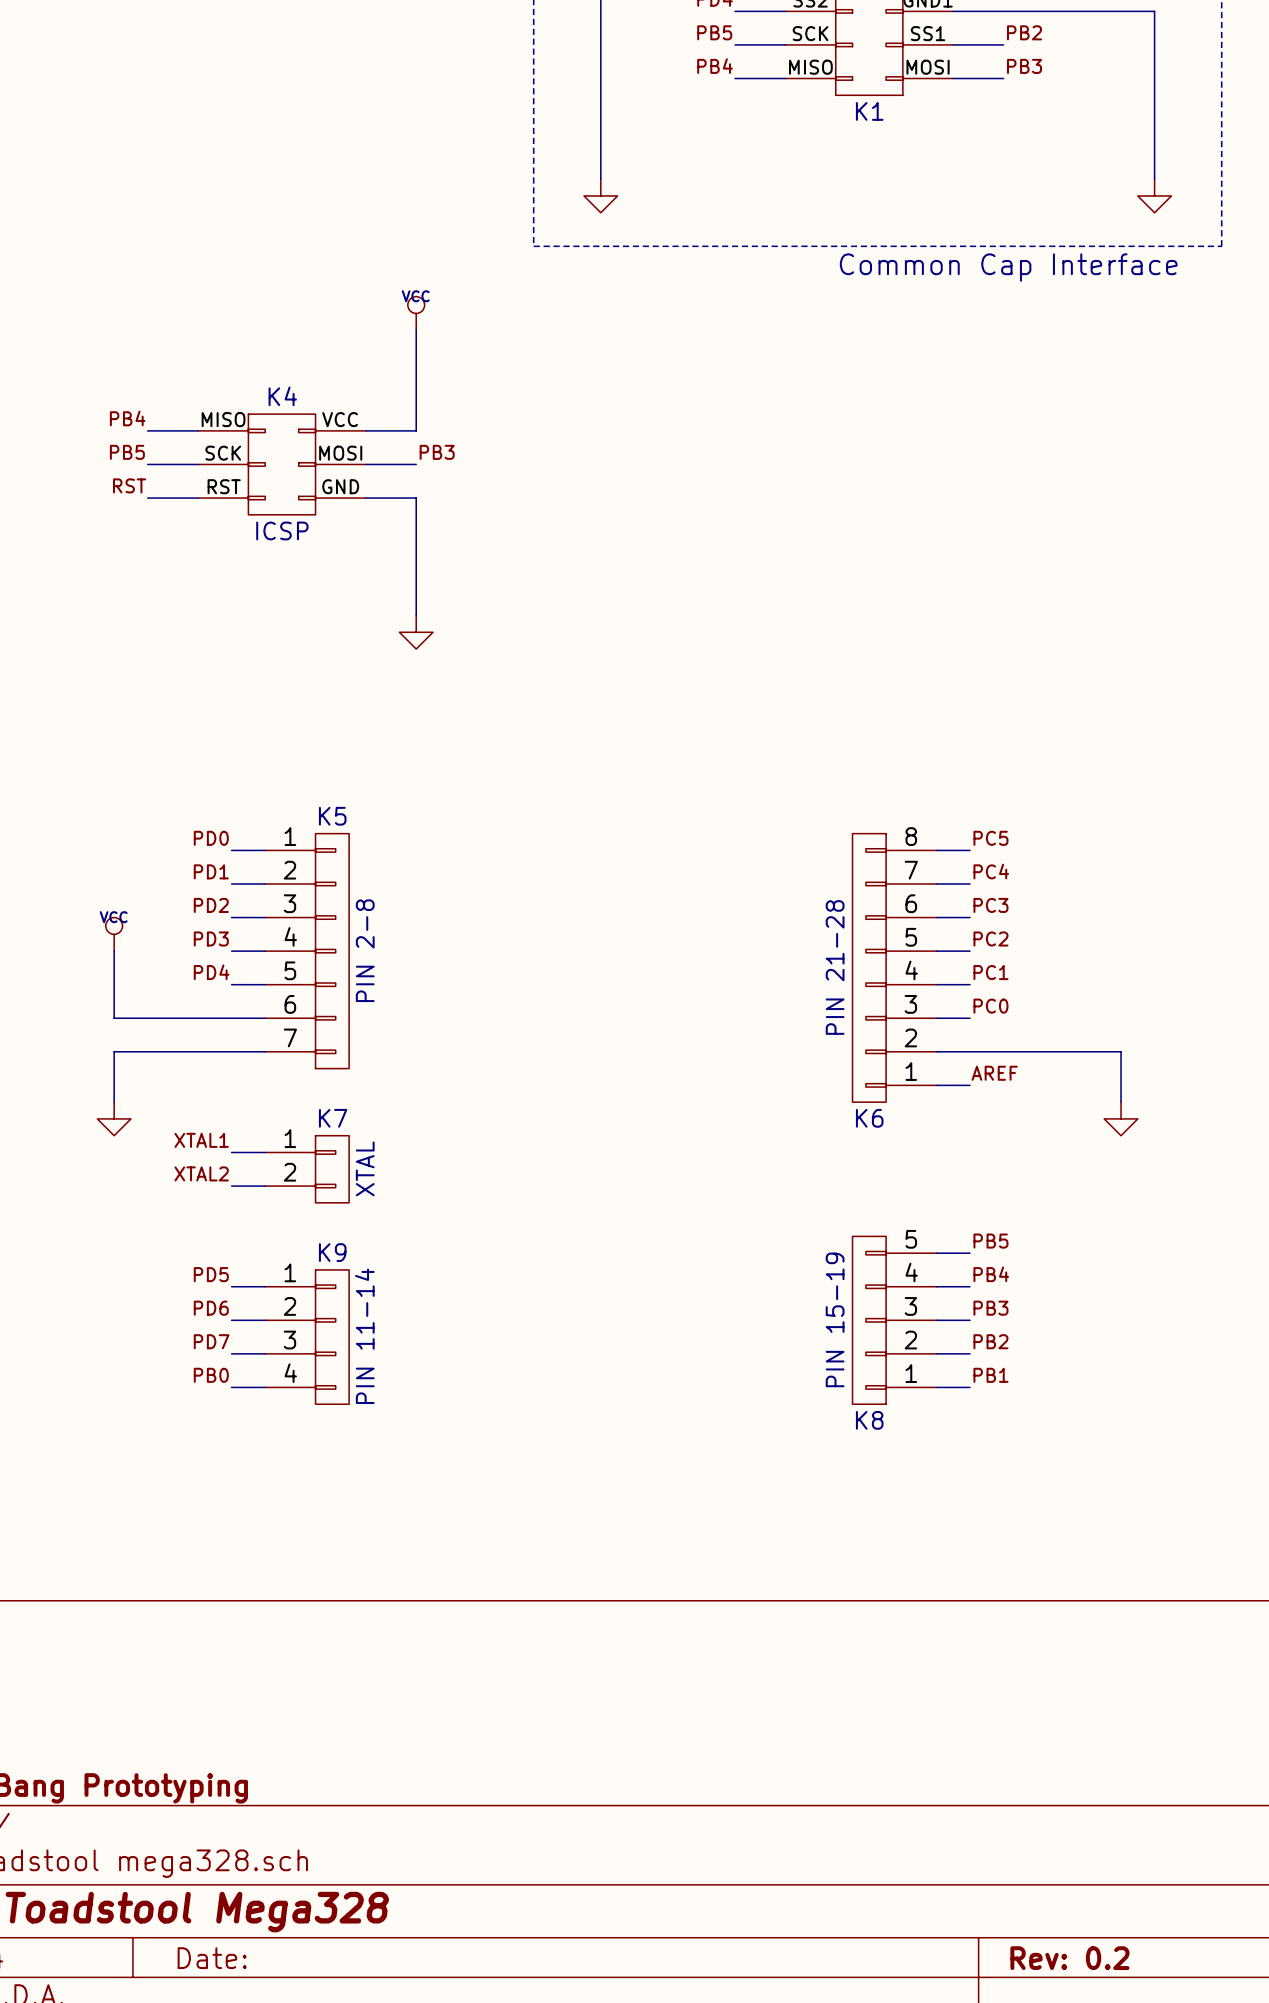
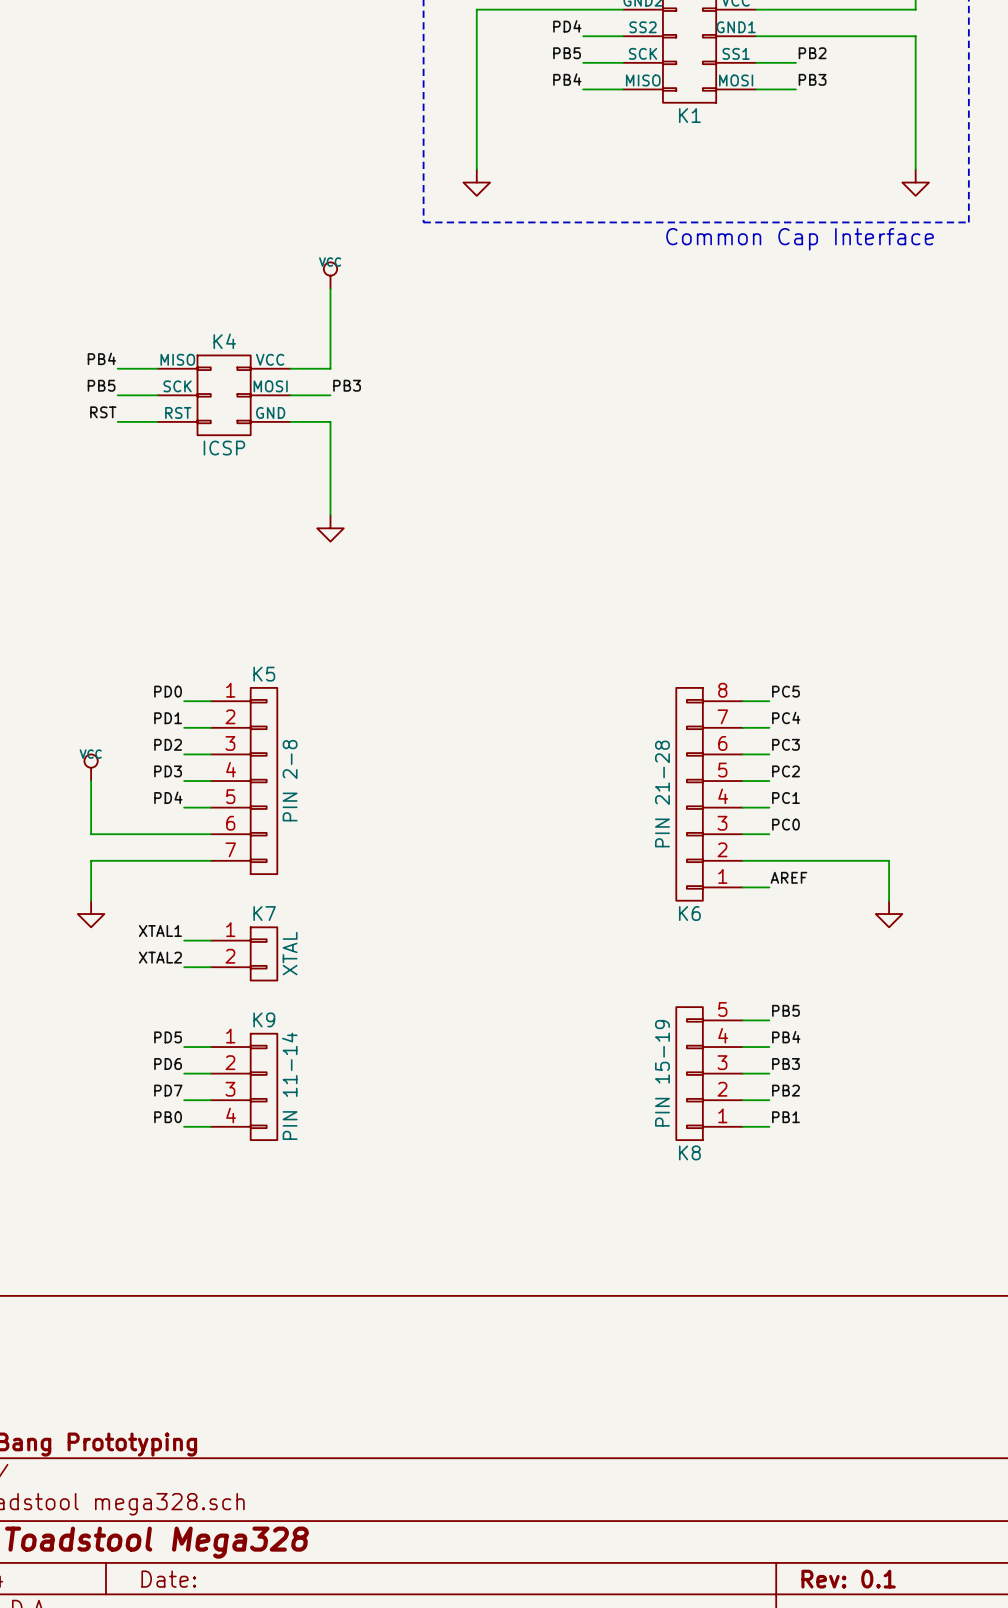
title block: Rev: 0.2 (1069, 1958) -> Rev: 0.1 (848, 1579)

